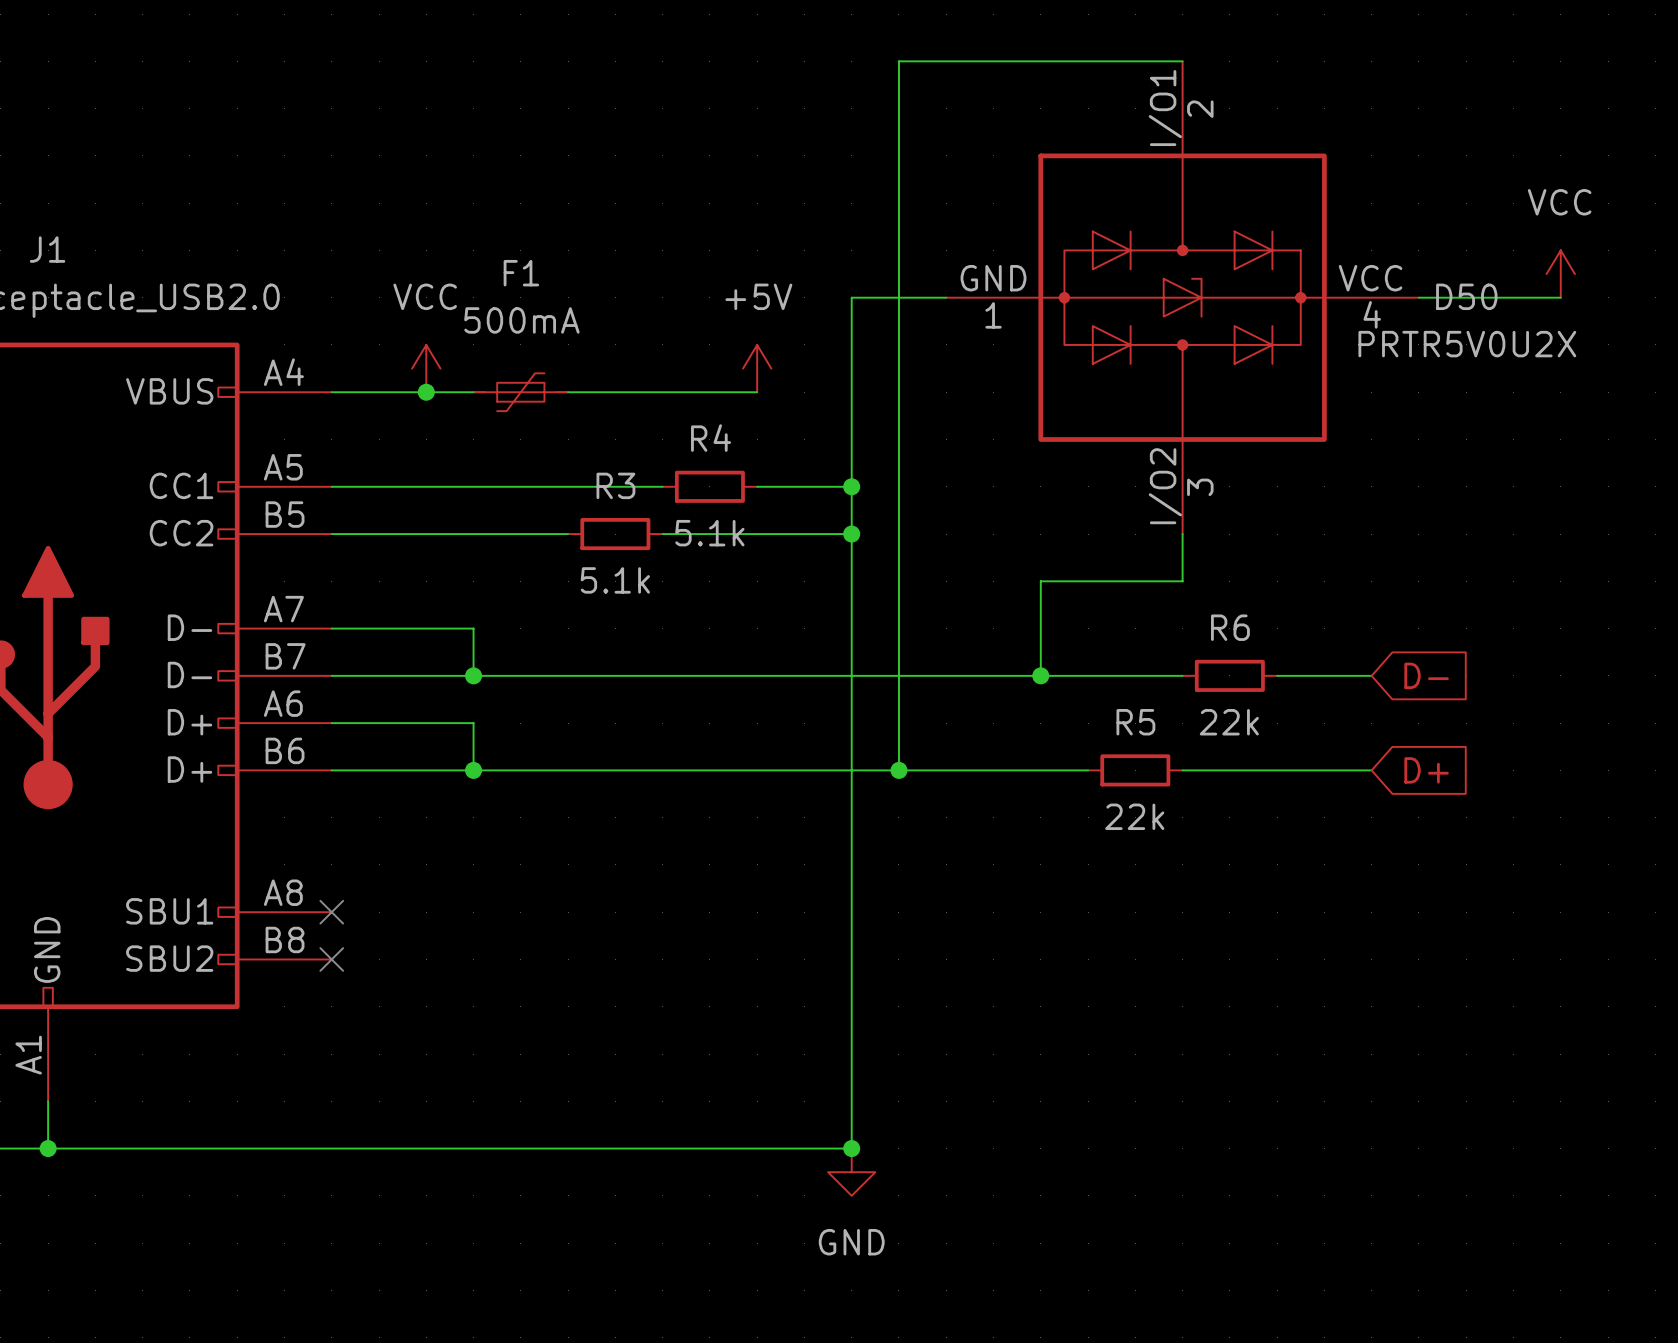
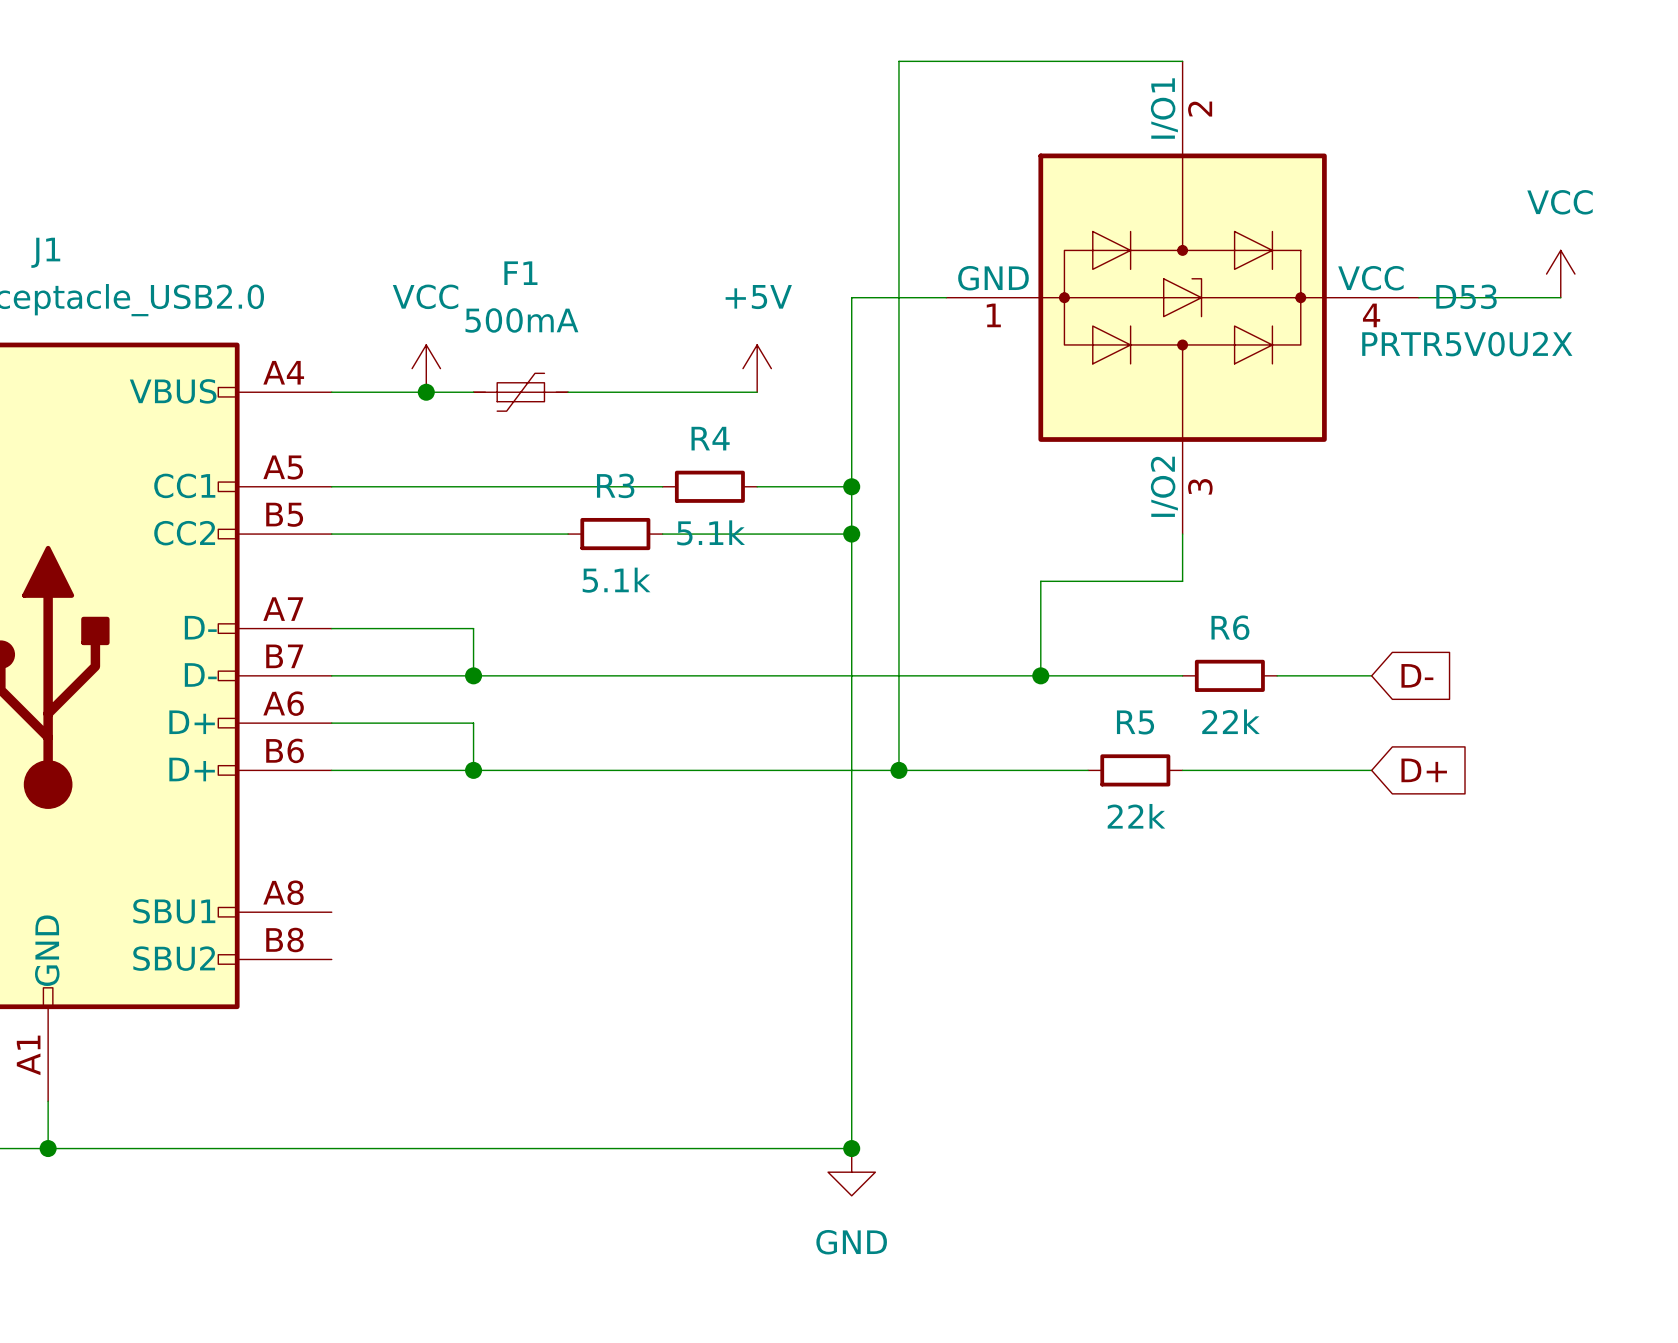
D50 name: D50 (1466, 296) -> D53 (1466, 296)
no-connect mark: (331, 912) -> none
no-connect mark: (331, 959) -> none

